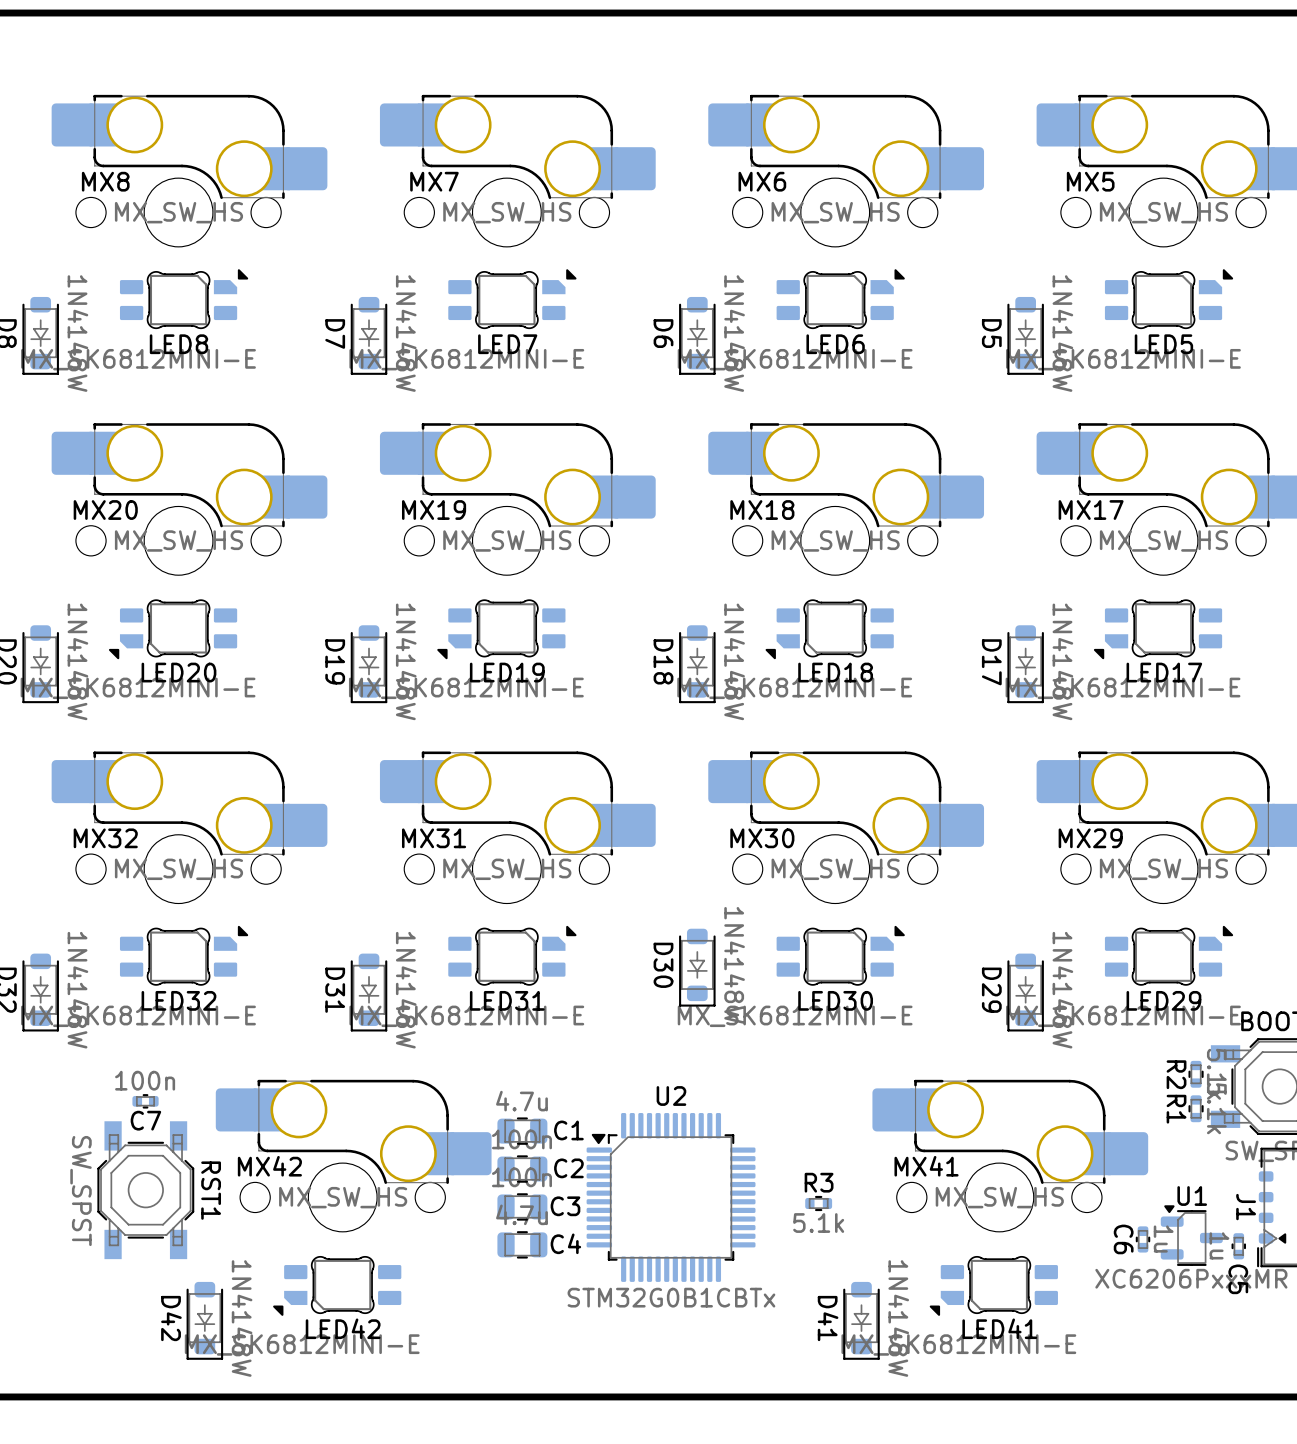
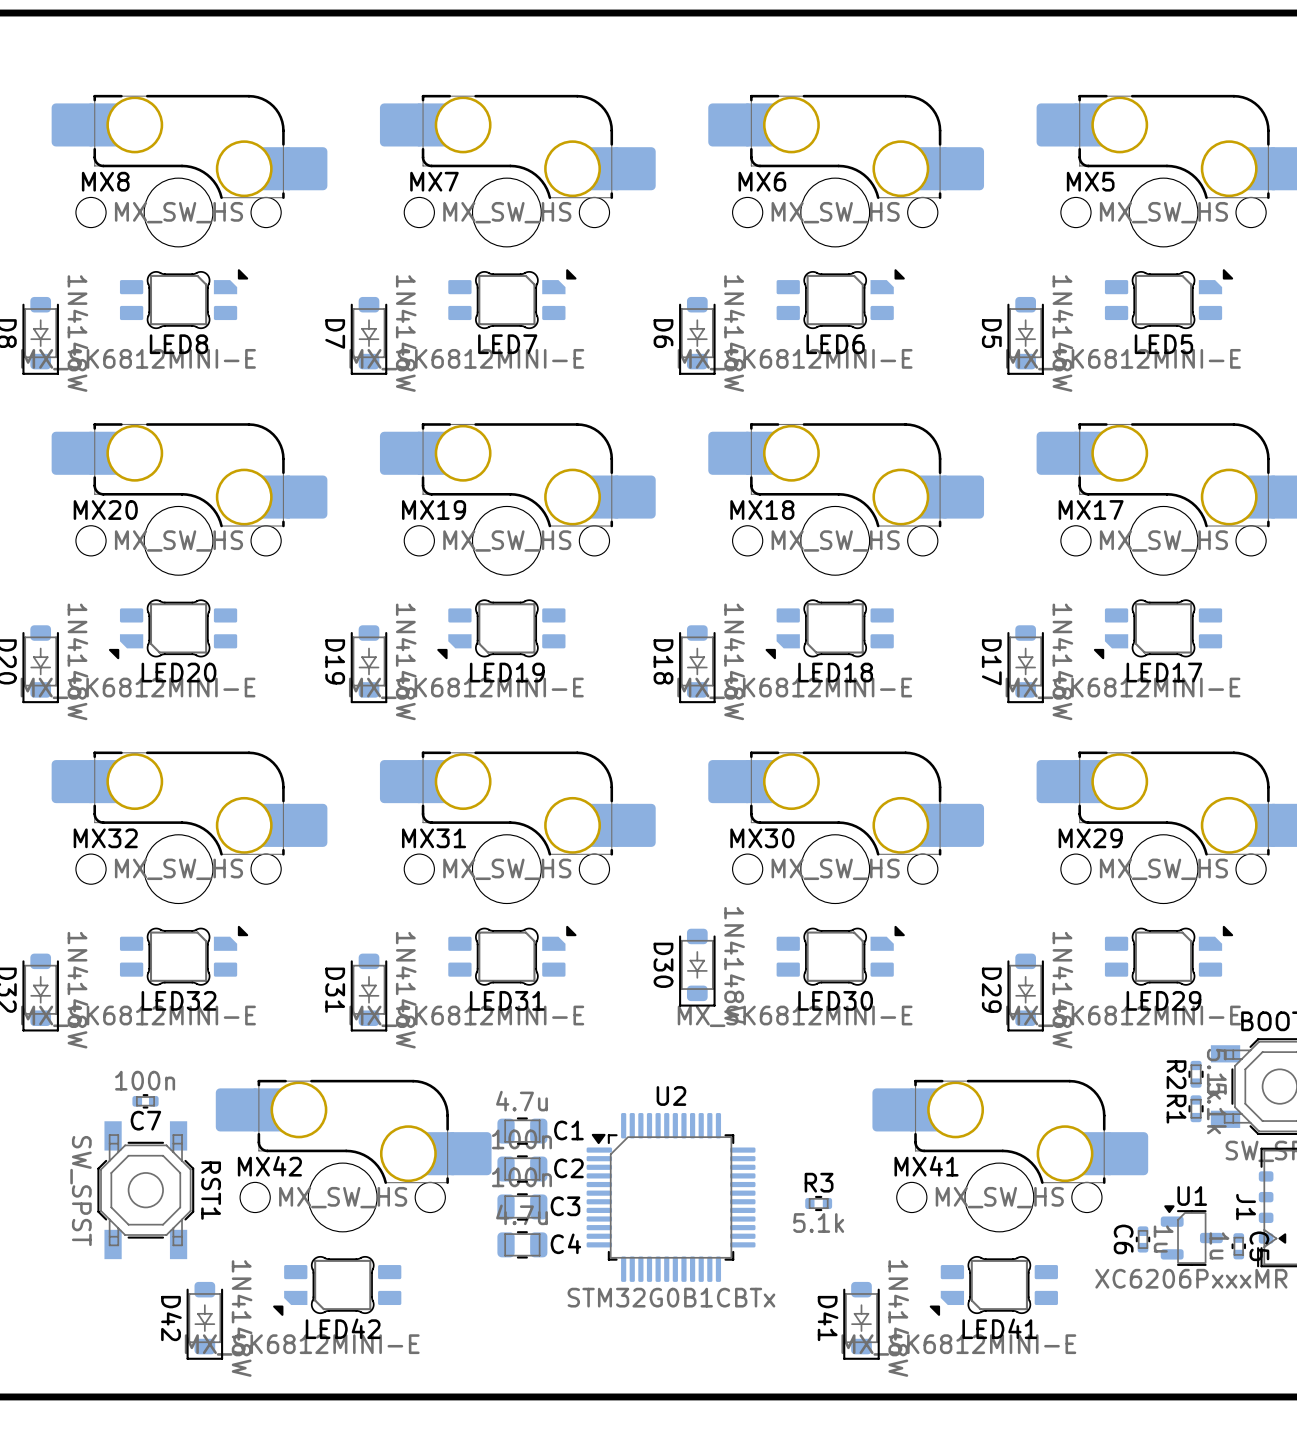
C5 name position: C5 (1238, 1279) -> C5 (1259, 1246)

